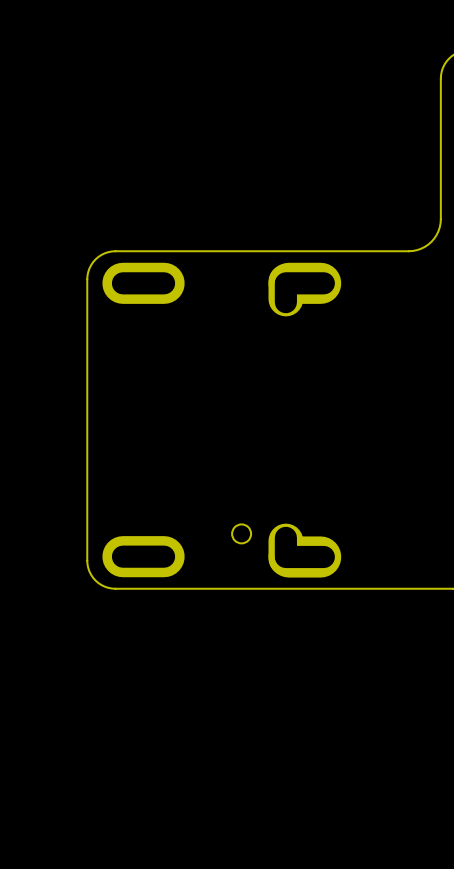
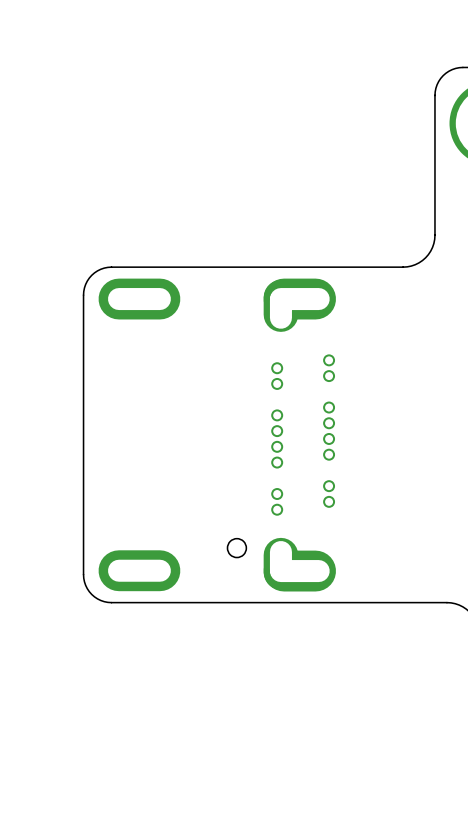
via: none -> (329, 360)
via: none -> (277, 368)
via: none -> (329, 376)
via: none -> (277, 383)
via: none -> (329, 407)
via: none -> (277, 415)
via: none -> (329, 423)
via: none -> (277, 431)
via: none -> (329, 438)
via: none -> (277, 446)
via: none -> (329, 454)
via: none -> (277, 462)
via: none -> (329, 486)
via: none -> (277, 494)
via: none -> (329, 501)
via: none -> (277, 509)

